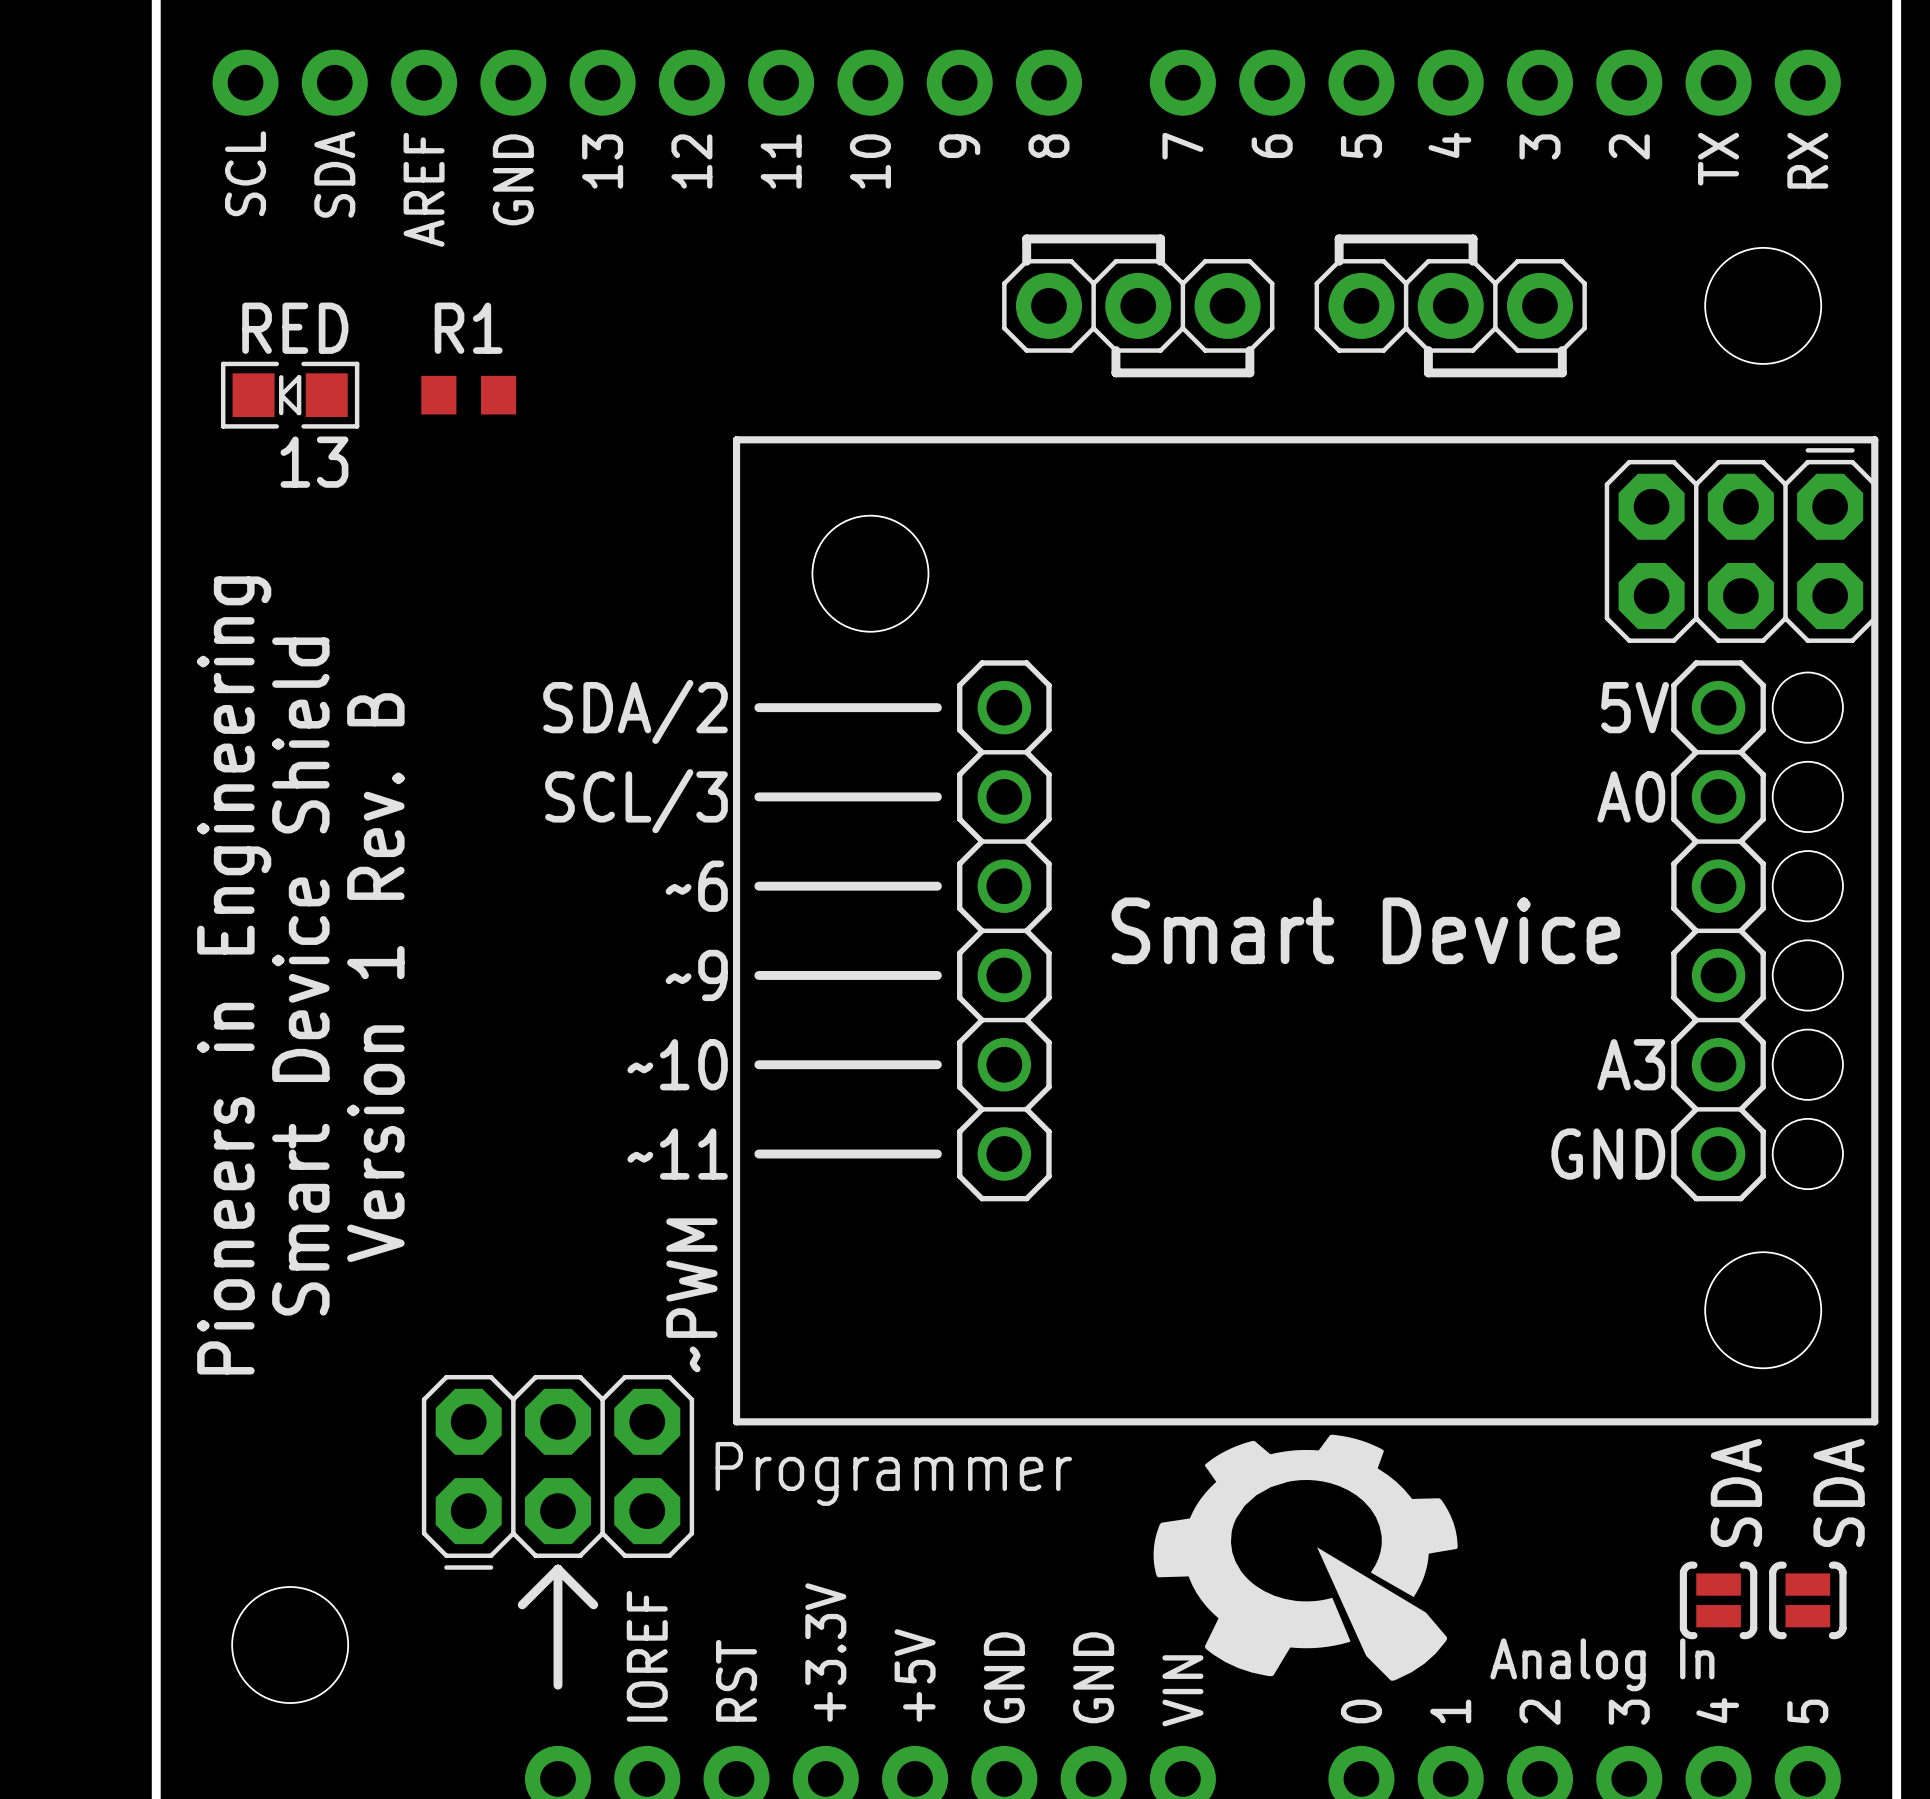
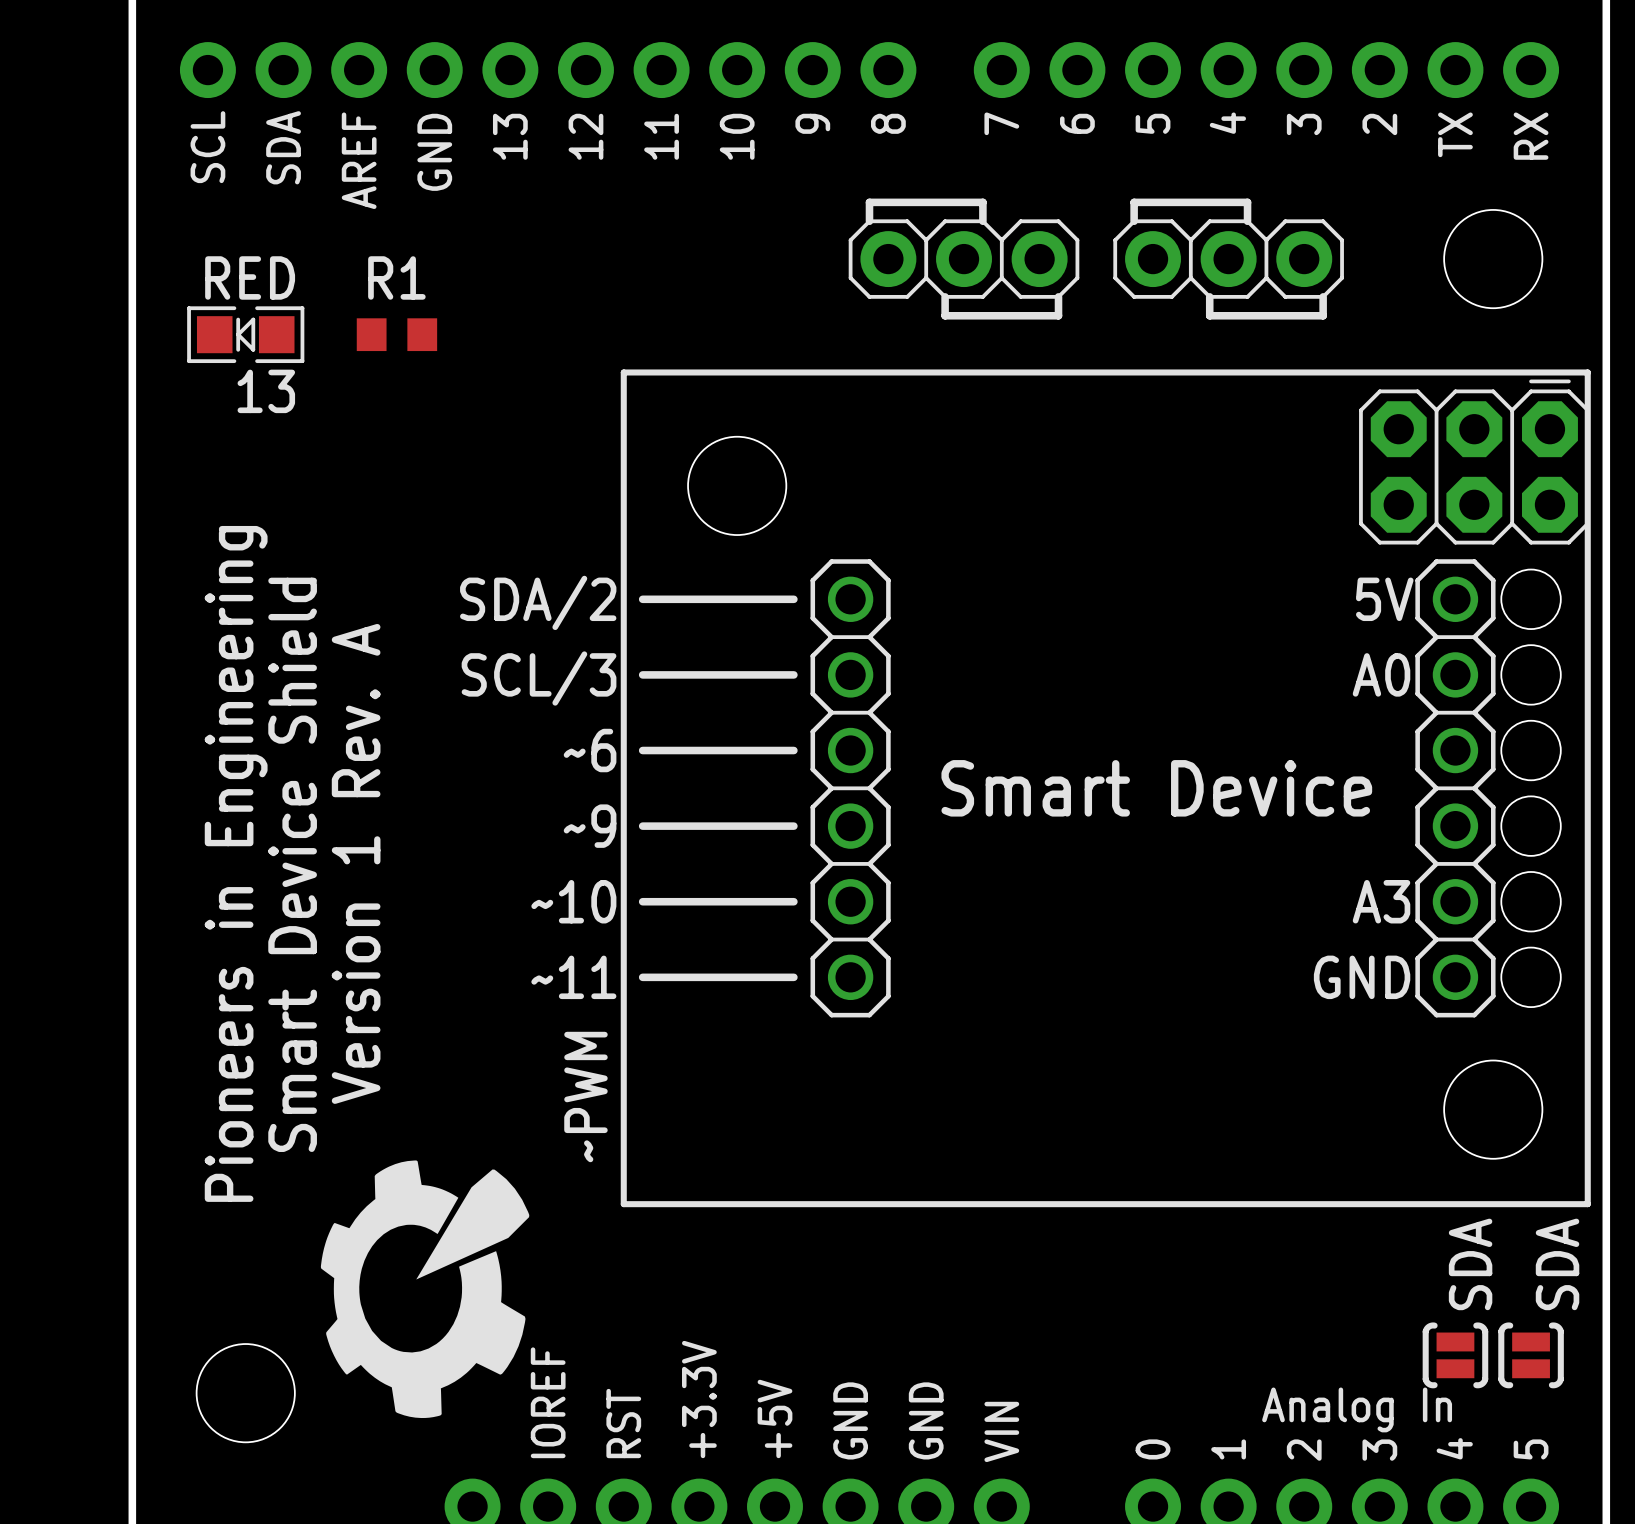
text position: Pioneers in Engineering (234, 975) -> Pioneers in Engineering (236, 863)
text position: Smart Device Shield (300, 976) -> Smart Device Shield (292, 864)
text: Version 1 Rev. B (375, 977) -> Version 1 Rev. A (356, 863)
drawing: none -> [320, 1160, 530, 1419]
drawing: [1153, 1434, 1458, 1681] -> none
part: (557, 1472) -> none
text: Programmer (893, 1473) -> none
line: (557, 1569) (557, 1685) -> none
line: (557, 1569) (522, 1604) -> none
line: (557, 1569) (593, 1604) -> none

